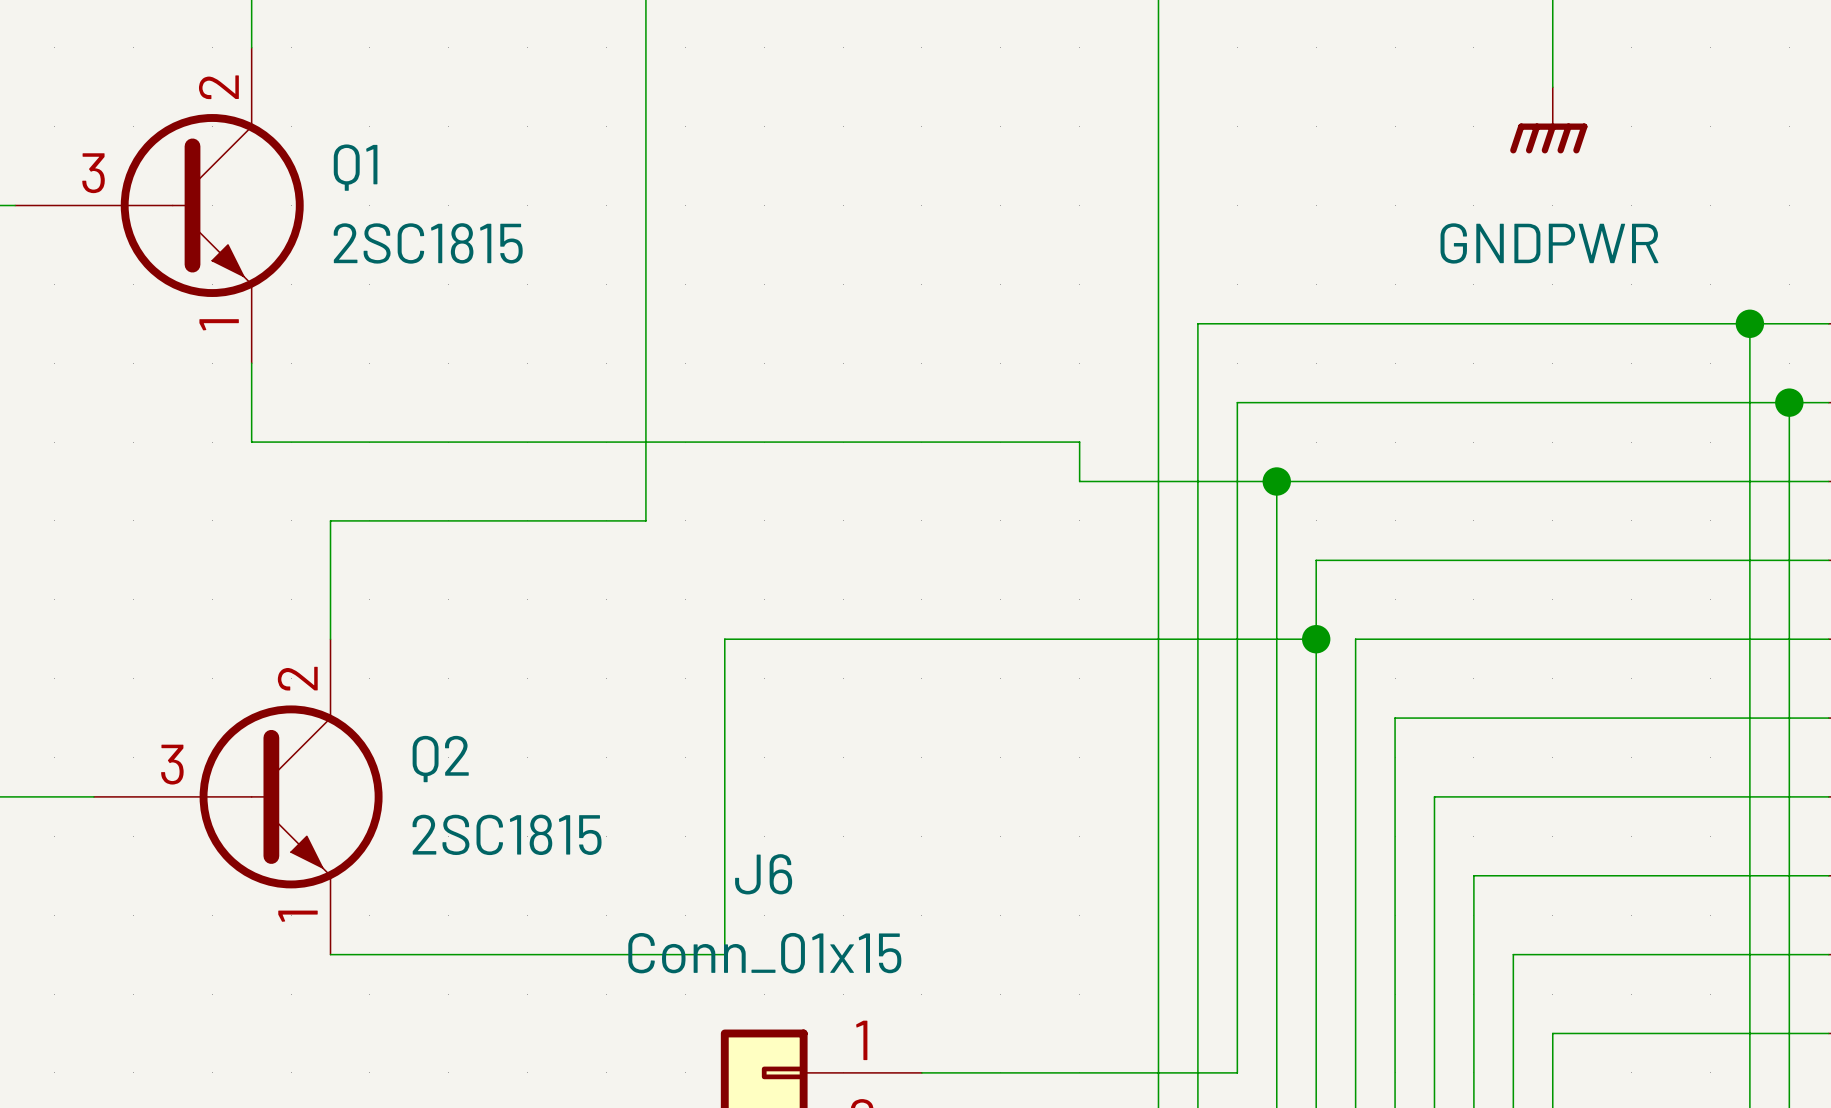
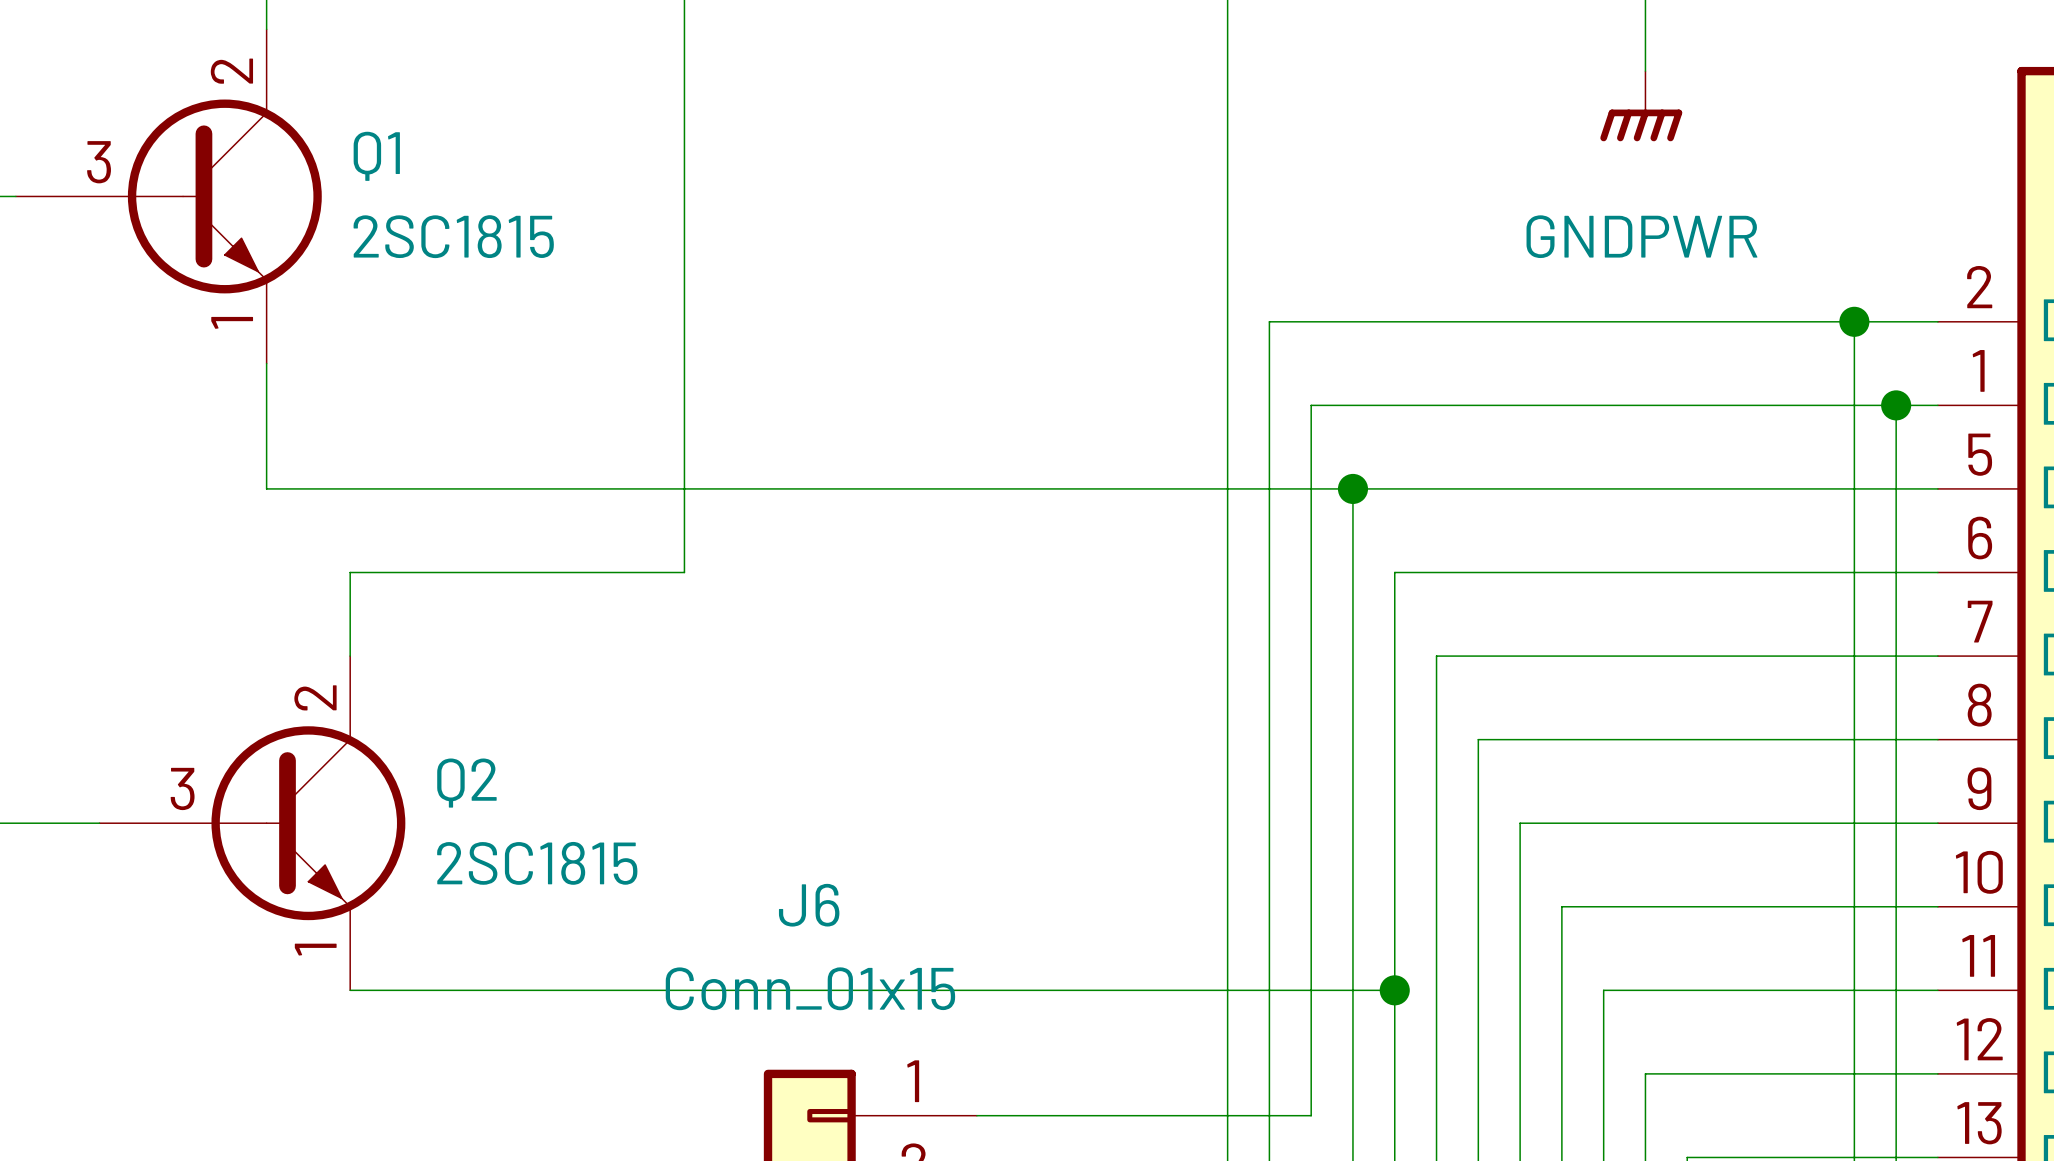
wire: (251, 442) (1079, 442) (1079, 481) -> (266, 447) (266, 488) (1144, 488)
wire: (645, 520) (330, 520) (330, 560) -> (684, 530) (684, 572) (350, 572)
wire: (1316, 639) (724, 639) (724, 954) -> (1394, 990) (768, 990)
junction: (1316, 639) -> none
junction: none -> (1394, 990)

